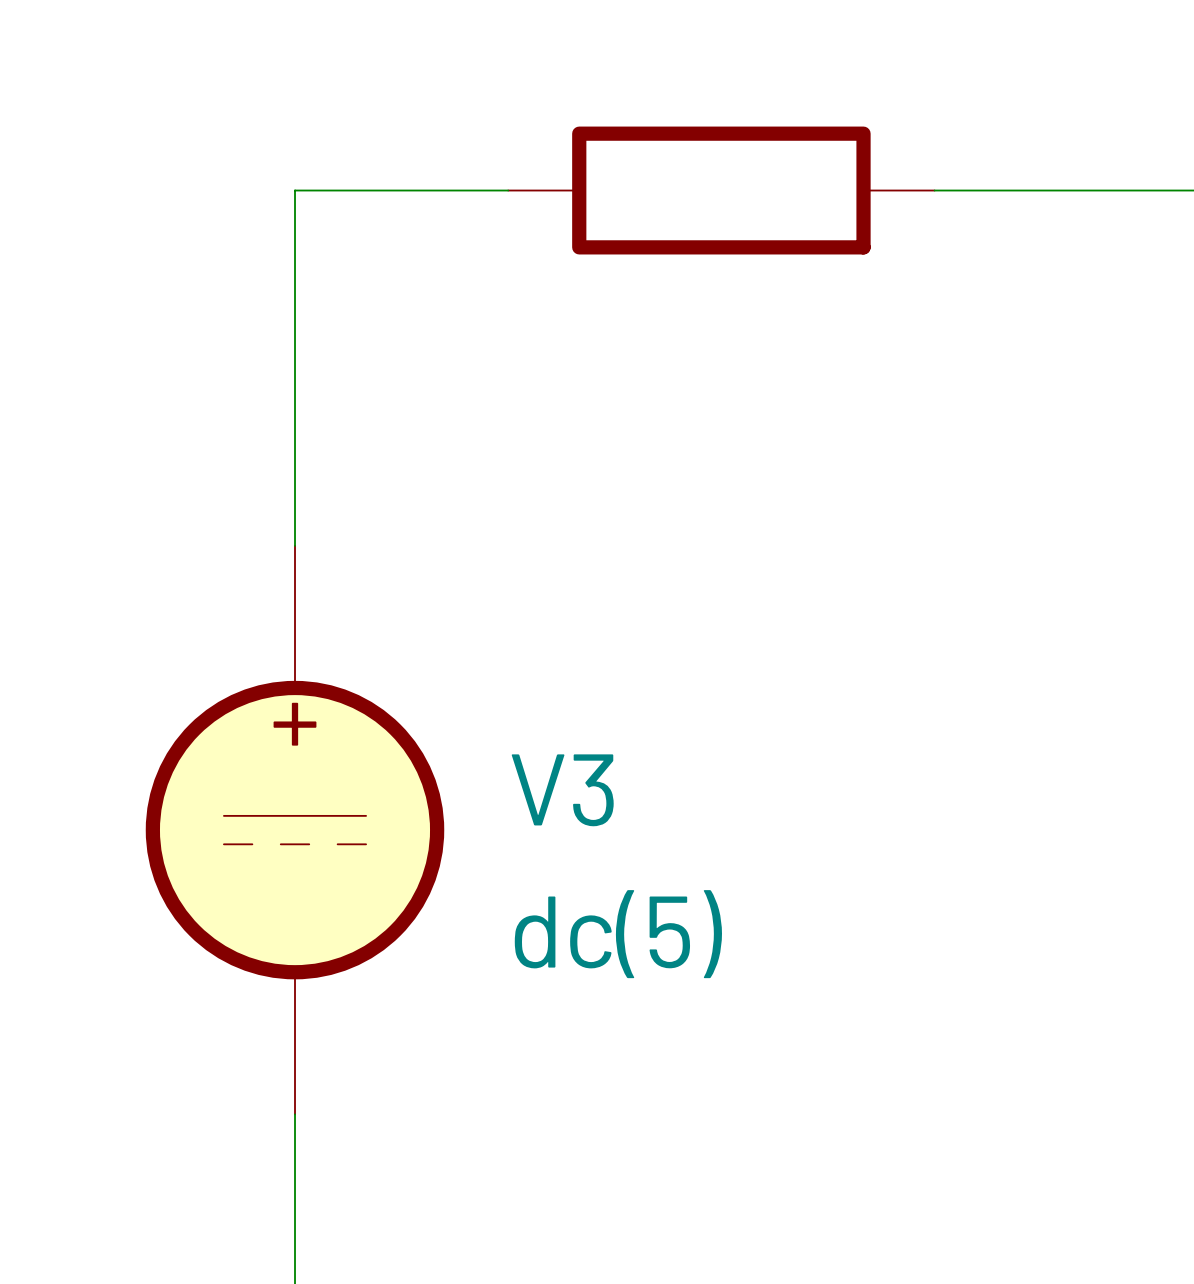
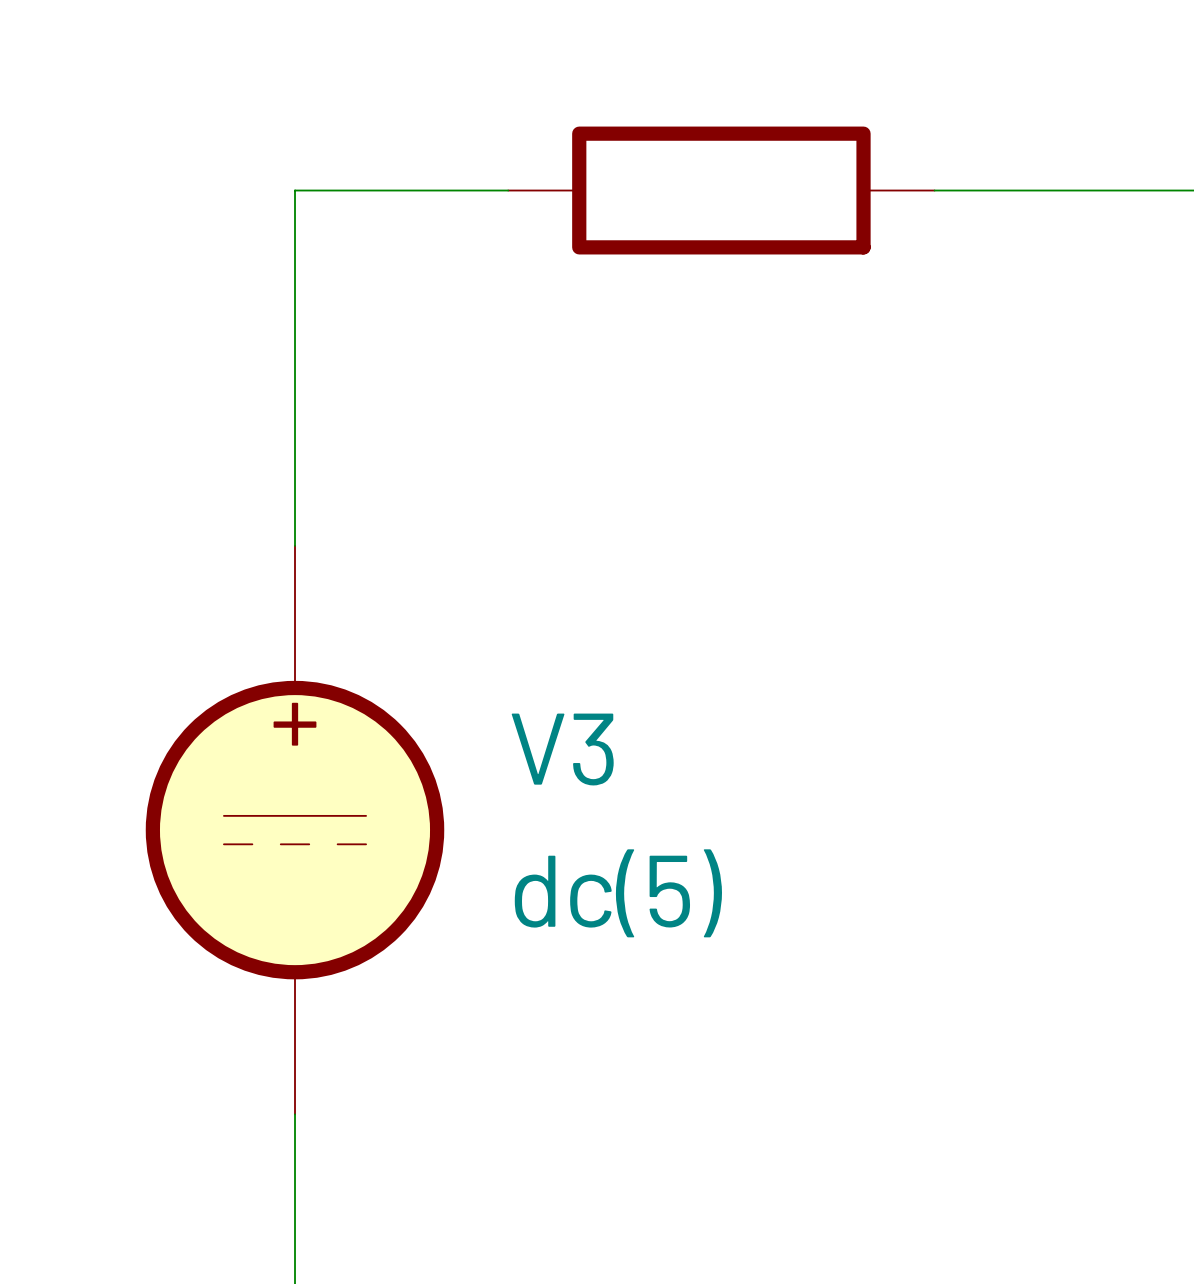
V3 name position: V3 (562, 790) -> V3 (562, 749)
V3 value position: dc(5) (618, 934) -> dc(5) (618, 893)

